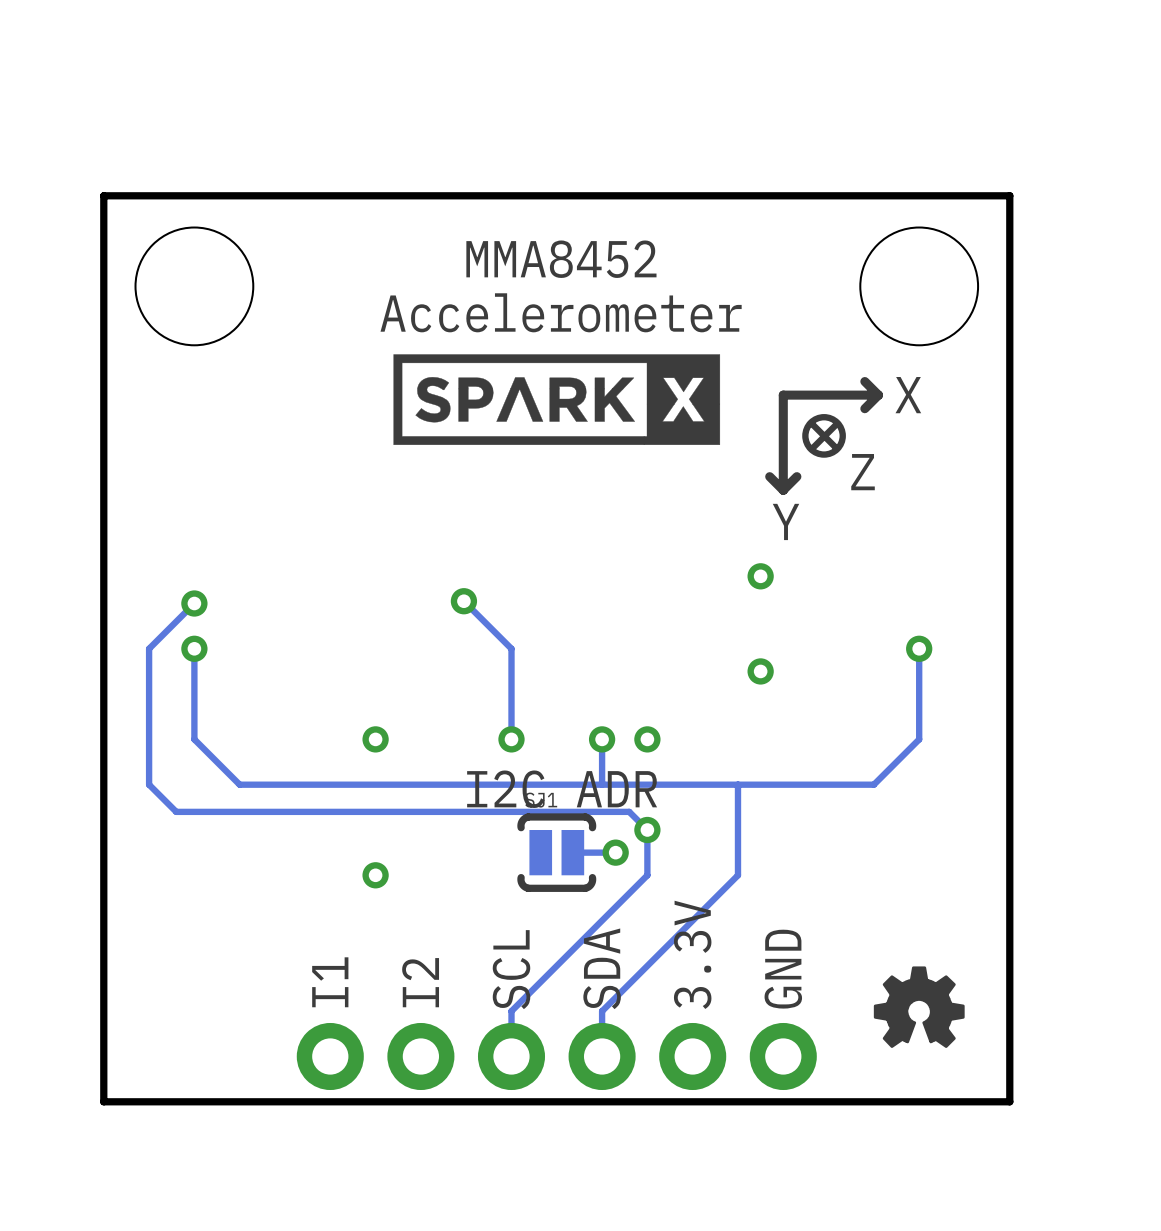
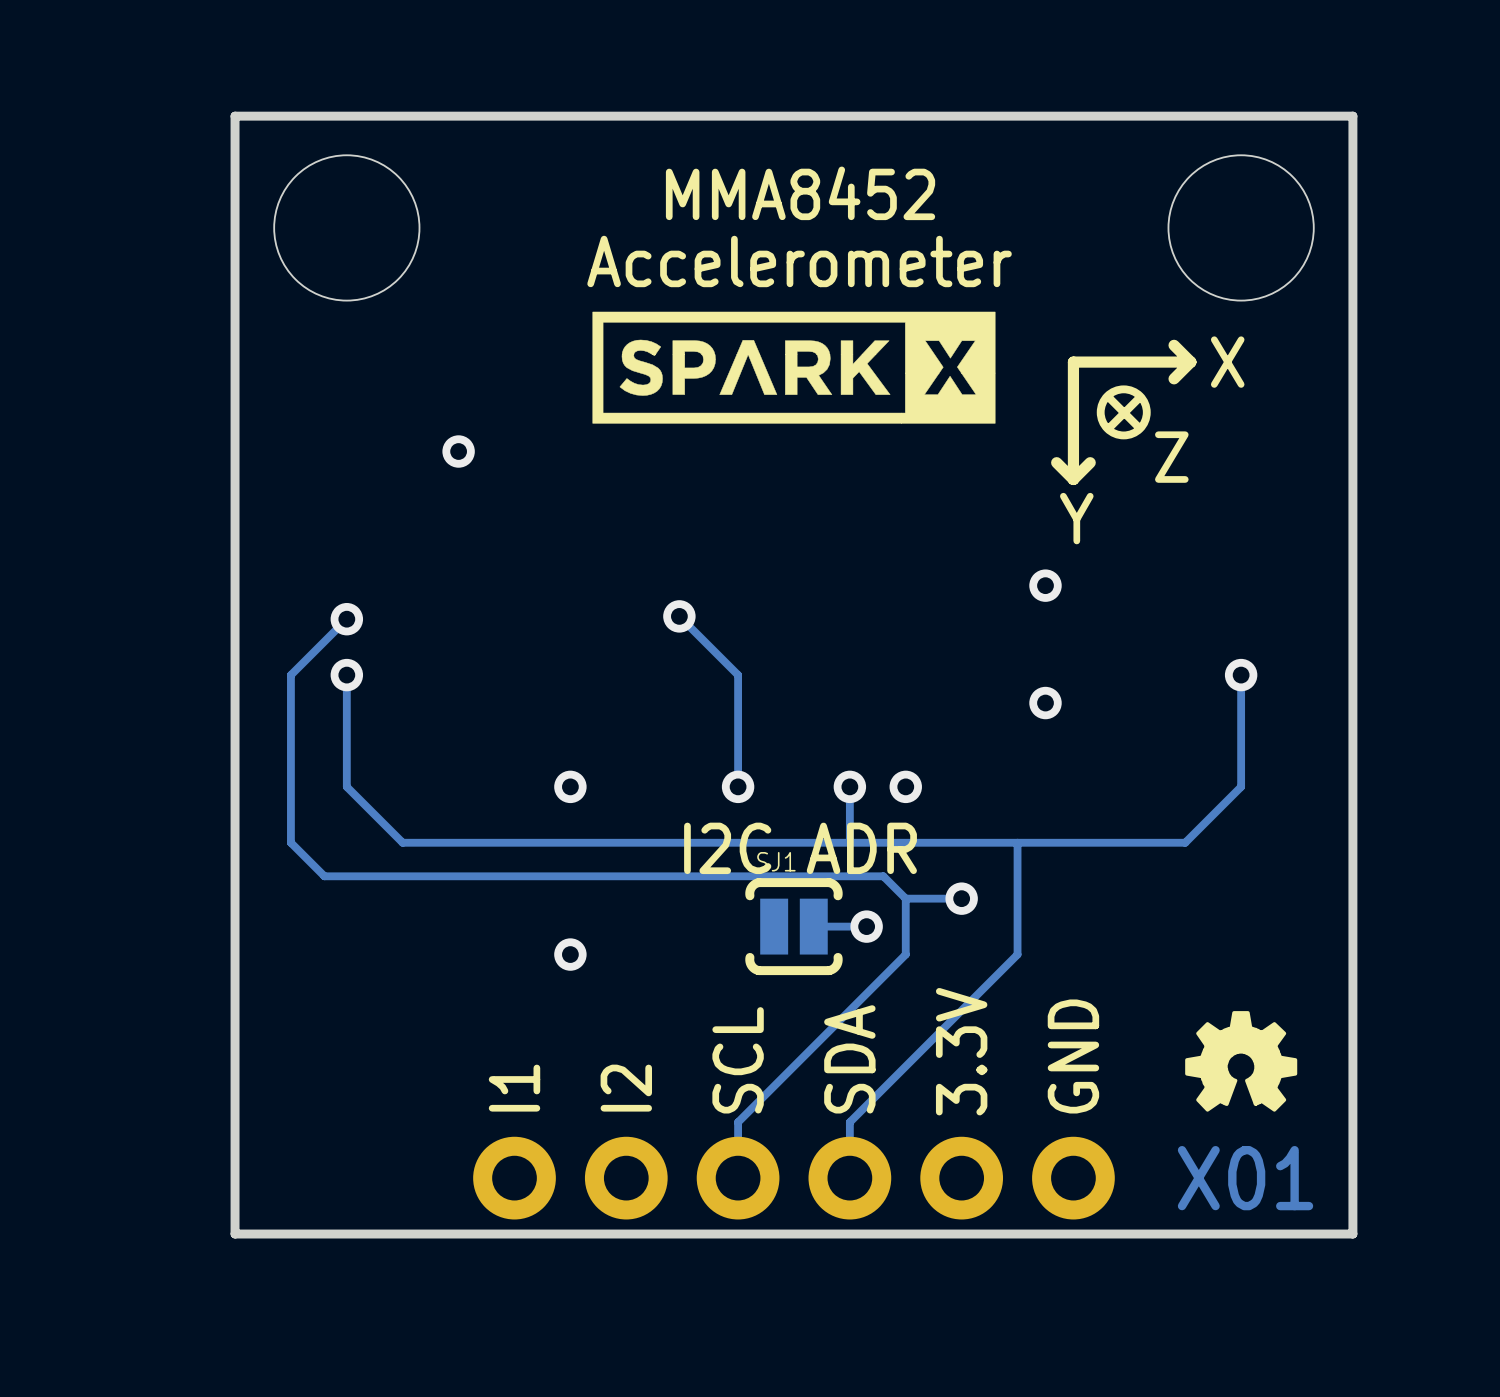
via: none -> (458, 451)
via position: (647, 829) -> (961, 898)
track: none -> (961, 898) (905, 898)
drawing position: (919, 1007) -> (1241, 1061)
text: none -> X01 (1245, 1178)

